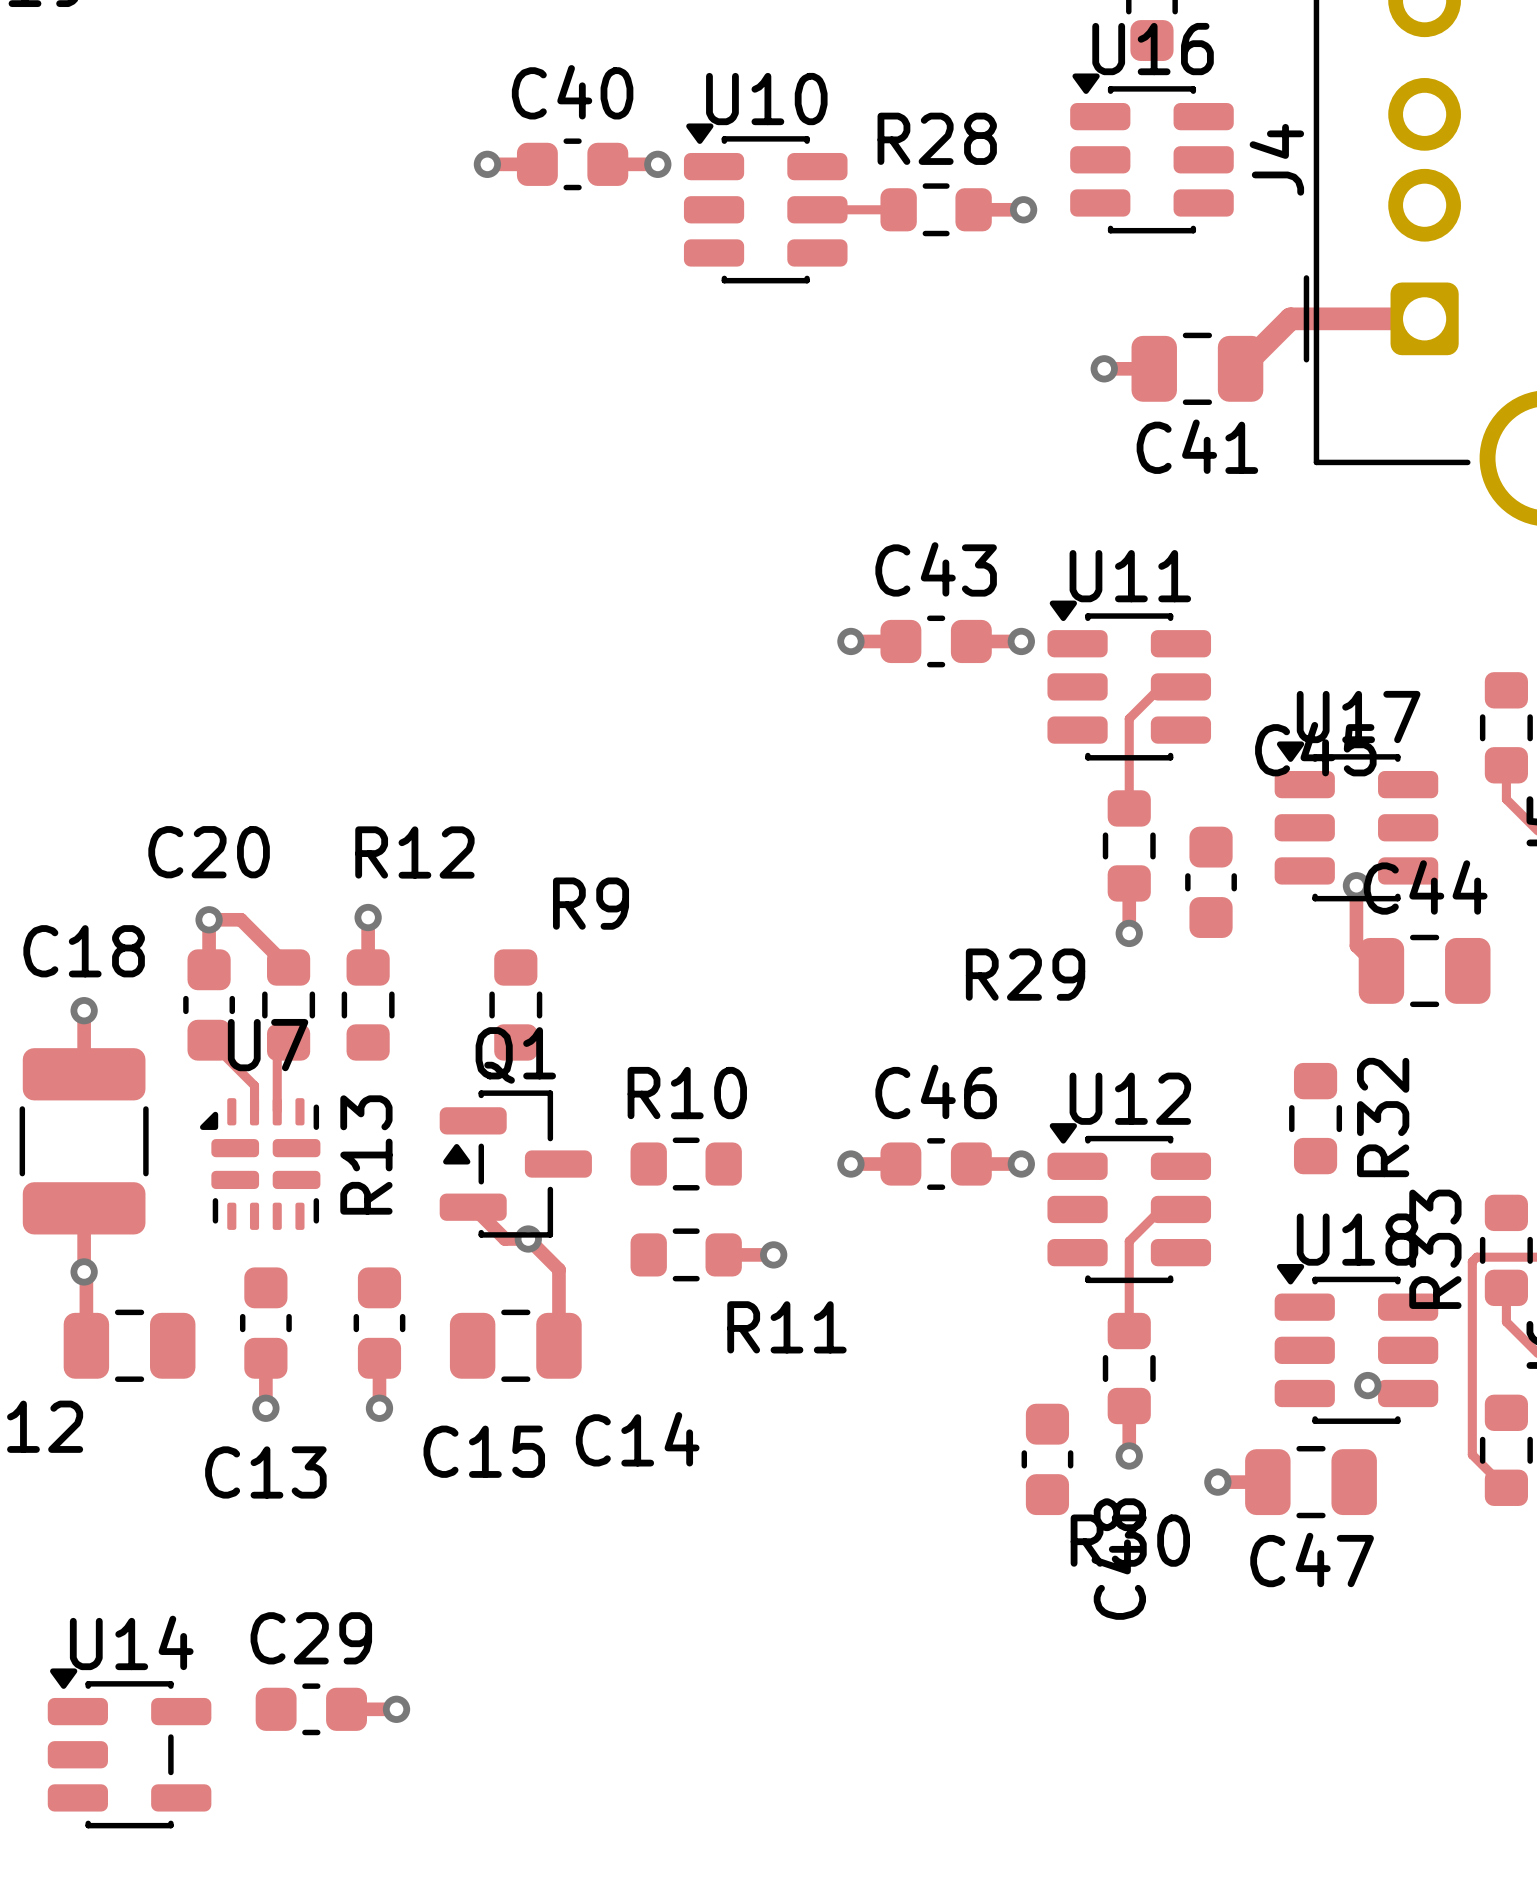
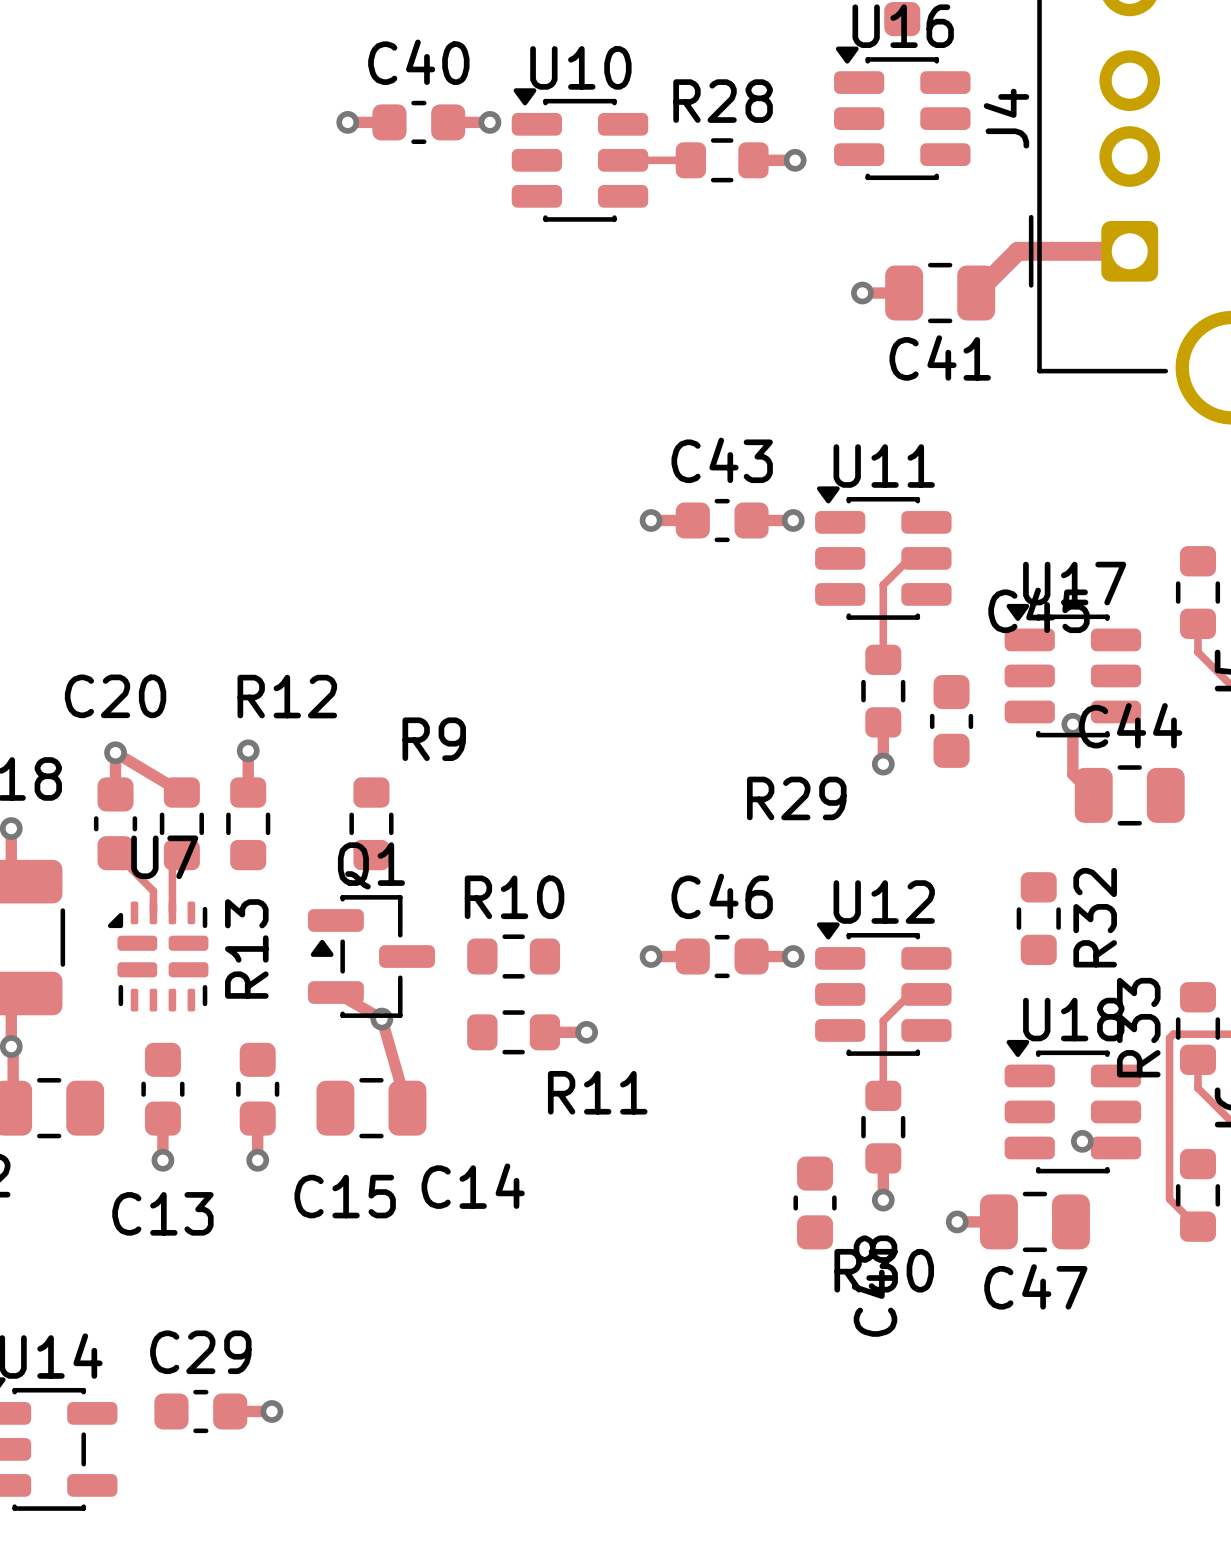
top track: (209, 919) (240, 919) (288, 967) -> (115, 752) (181, 792)
top track: (473, 1207) (505, 1239) (528, 1239) (558, 1269) (558, 1345) -> (335, 992) (381, 1019) (407, 1108)

